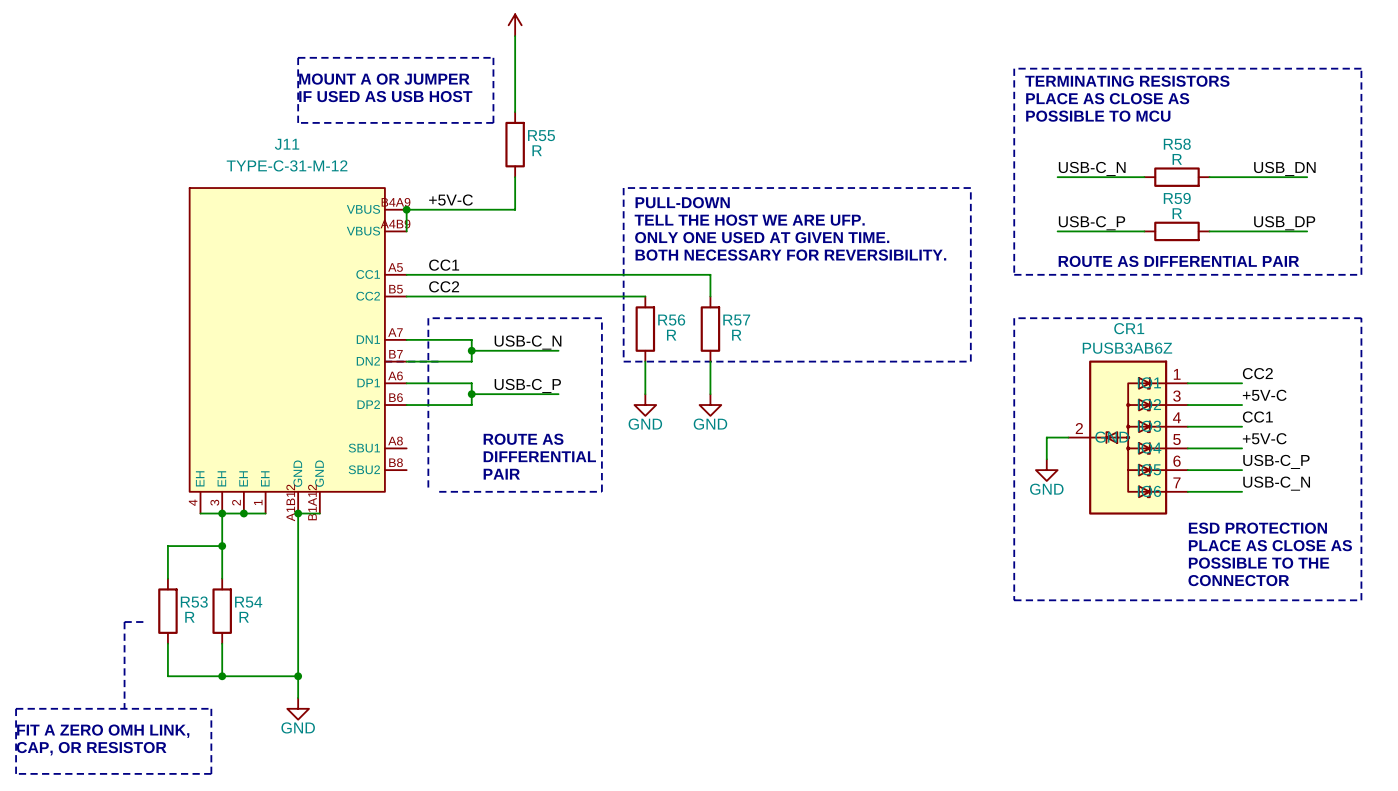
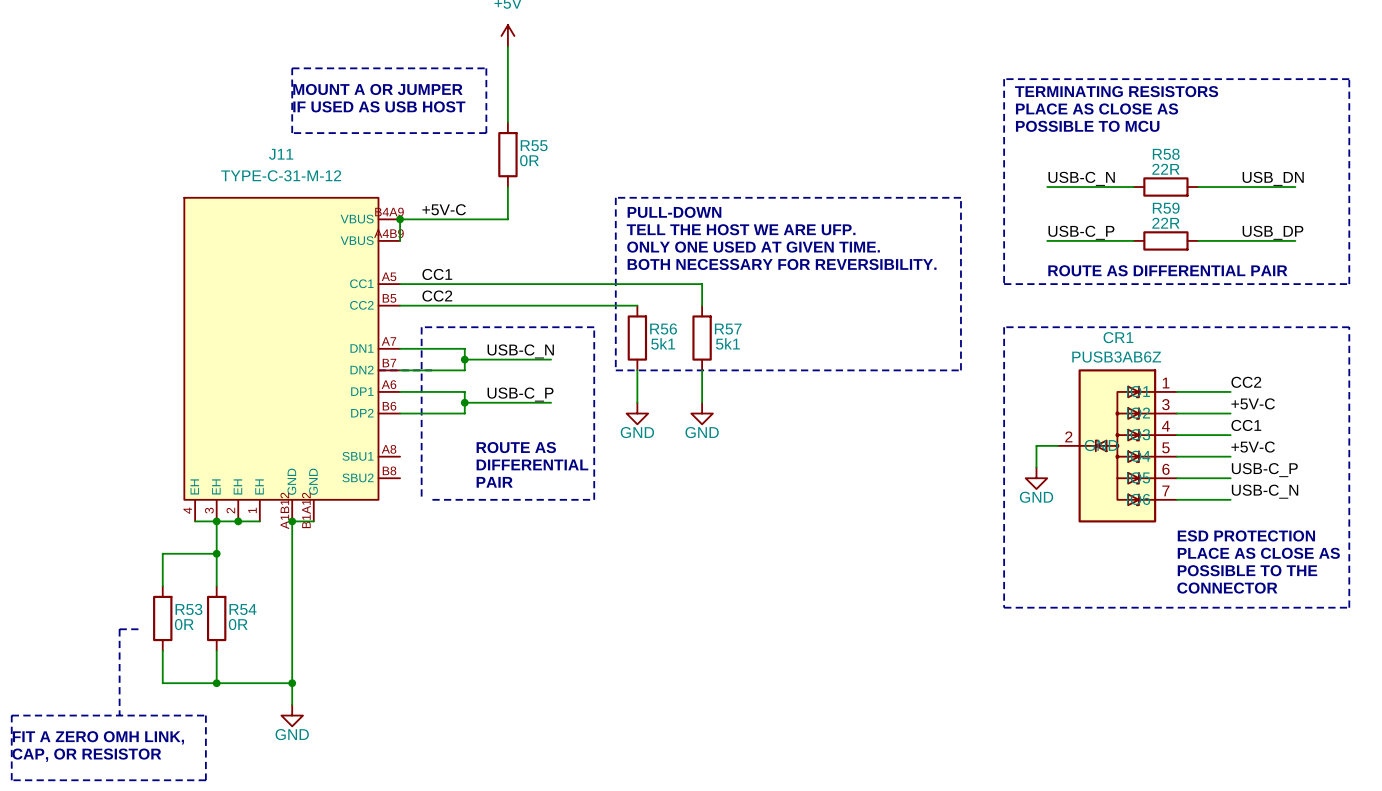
R55 value: R (537, 150) -> 0R (529, 160)
R58 value: R (1177, 159) -> 22R (1165, 169)
R59 value: R (1177, 213) -> 22R (1165, 223)
R56 value: R (671, 335) -> 5k1 (663, 343)
R57 value: R (736, 335) -> 5k1 (727, 343)
R53 value: R (189, 617) -> 0R (184, 624)
R54 value: R (244, 617) -> 0R (238, 624)

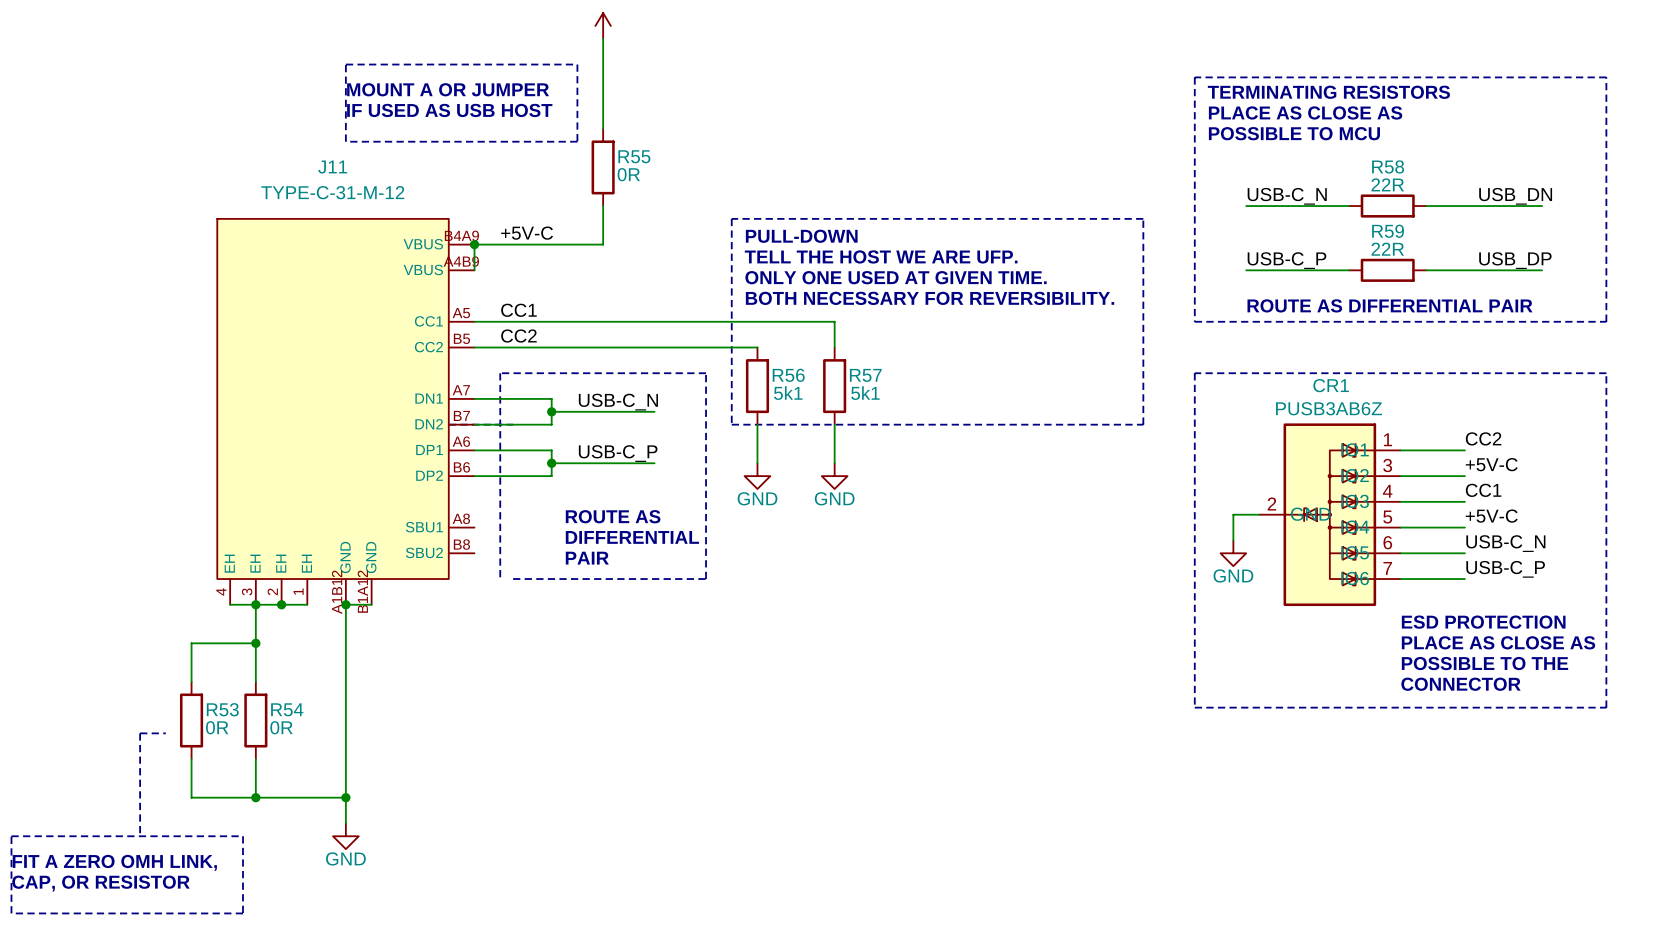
label: USB-C_P (1264, 470) -> USB-C_N (1505, 543)
label: USB-C_N (1265, 491) -> USB-C_P (1505, 569)

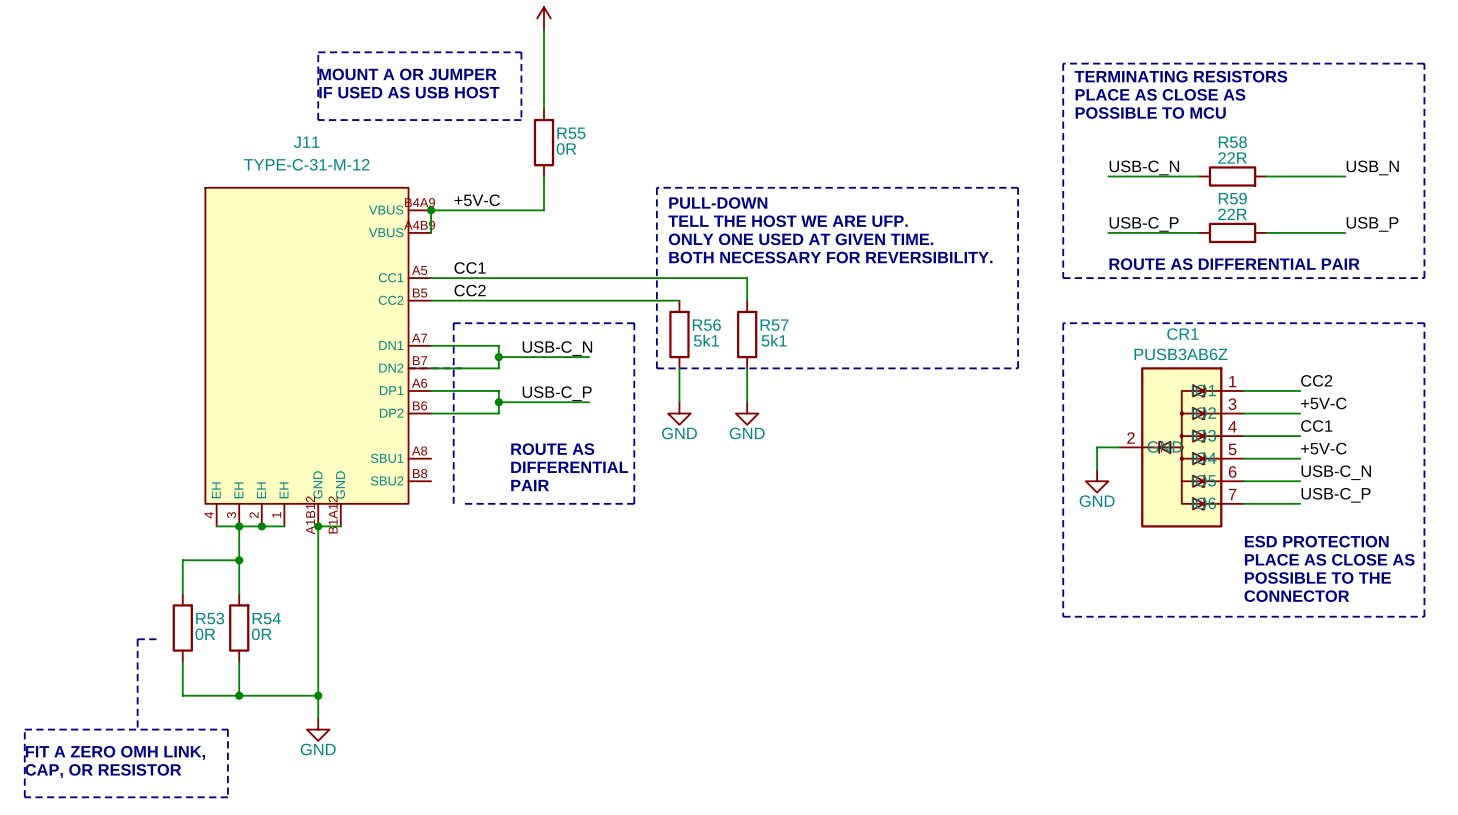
label: USB_DN (1515, 196) -> USB_N (1372, 167)
wire: (1516, 206) (1542, 206) -> none
label: USB_DP (1515, 260) -> USB_P (1372, 224)
wire: (1516, 270) (1542, 270) -> none

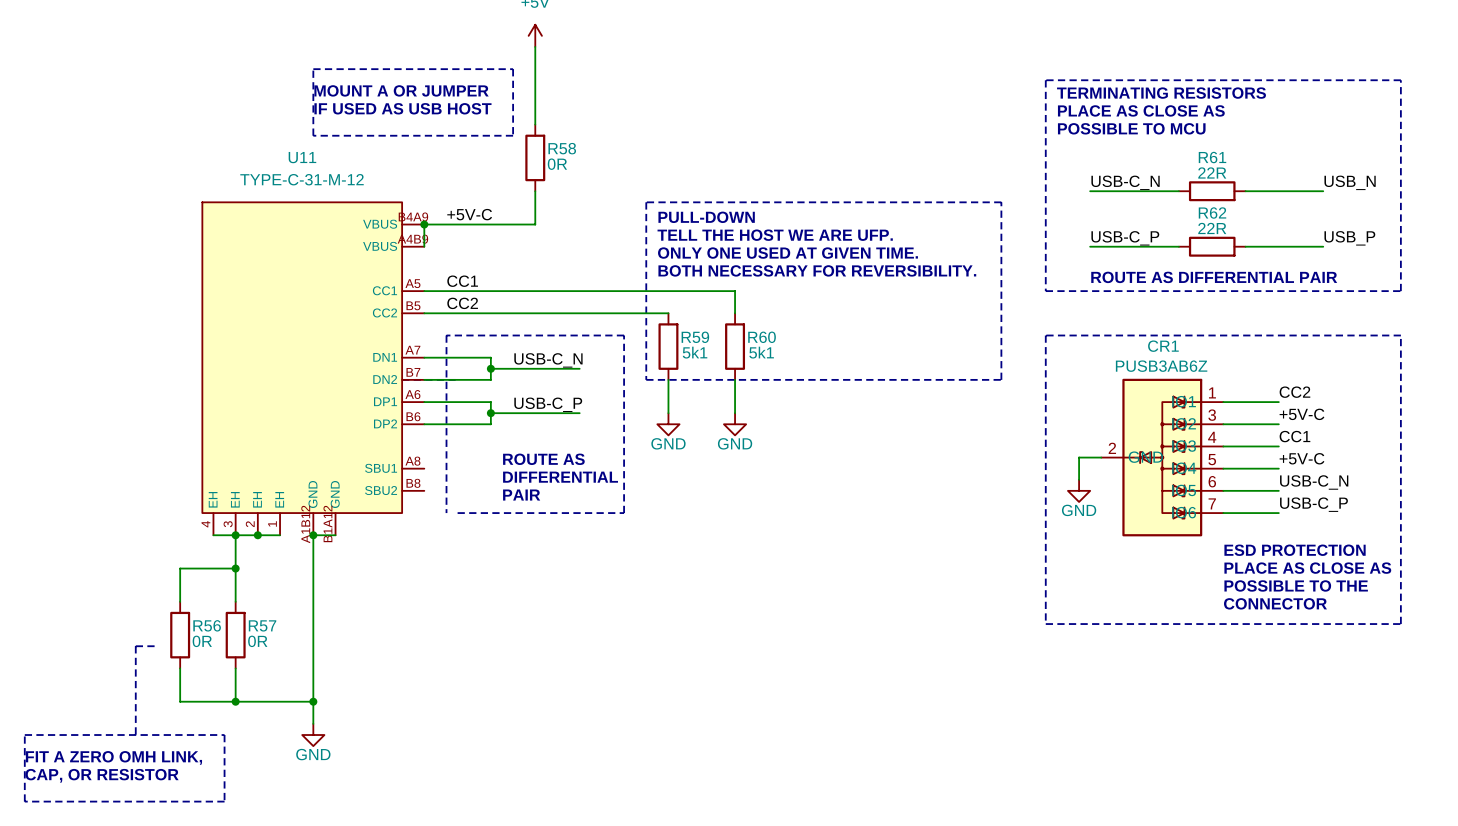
R55 name: R55 (571, 133) -> R58 (562, 148)
J11 name: J11 (306, 142) -> U11 (302, 157)
R58 name: R58 (1232, 142) -> R61 (1212, 157)
R59 name: R59 (1232, 198) -> R62 (1212, 213)
R56 name: R56 (706, 325) -> R59 (695, 337)
R57 name: R57 (774, 325) -> R60 (762, 337)
R53 name: R53 (210, 618) -> R56 (207, 625)
R54 name: R54 (266, 618) -> R57 (262, 625)

